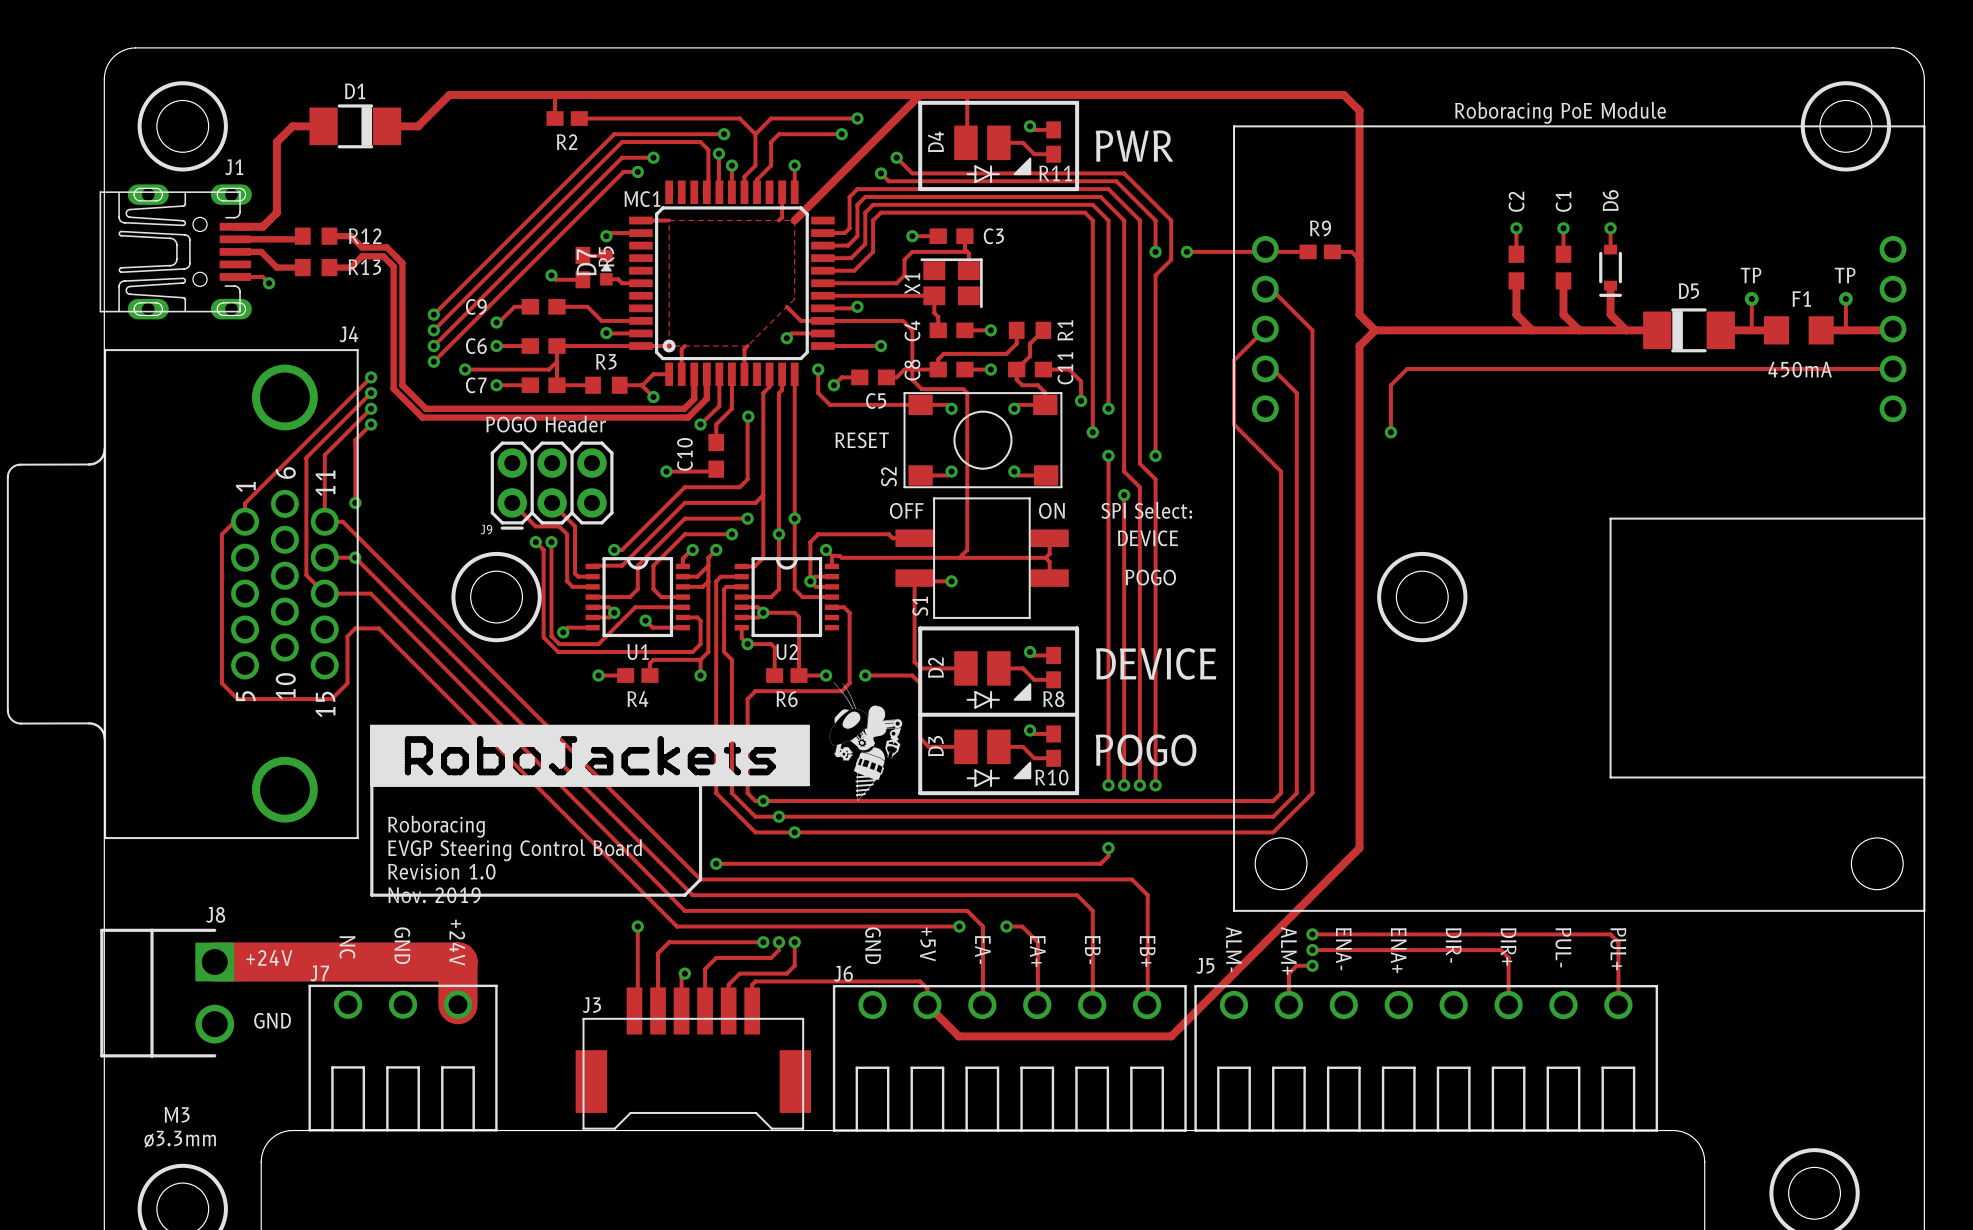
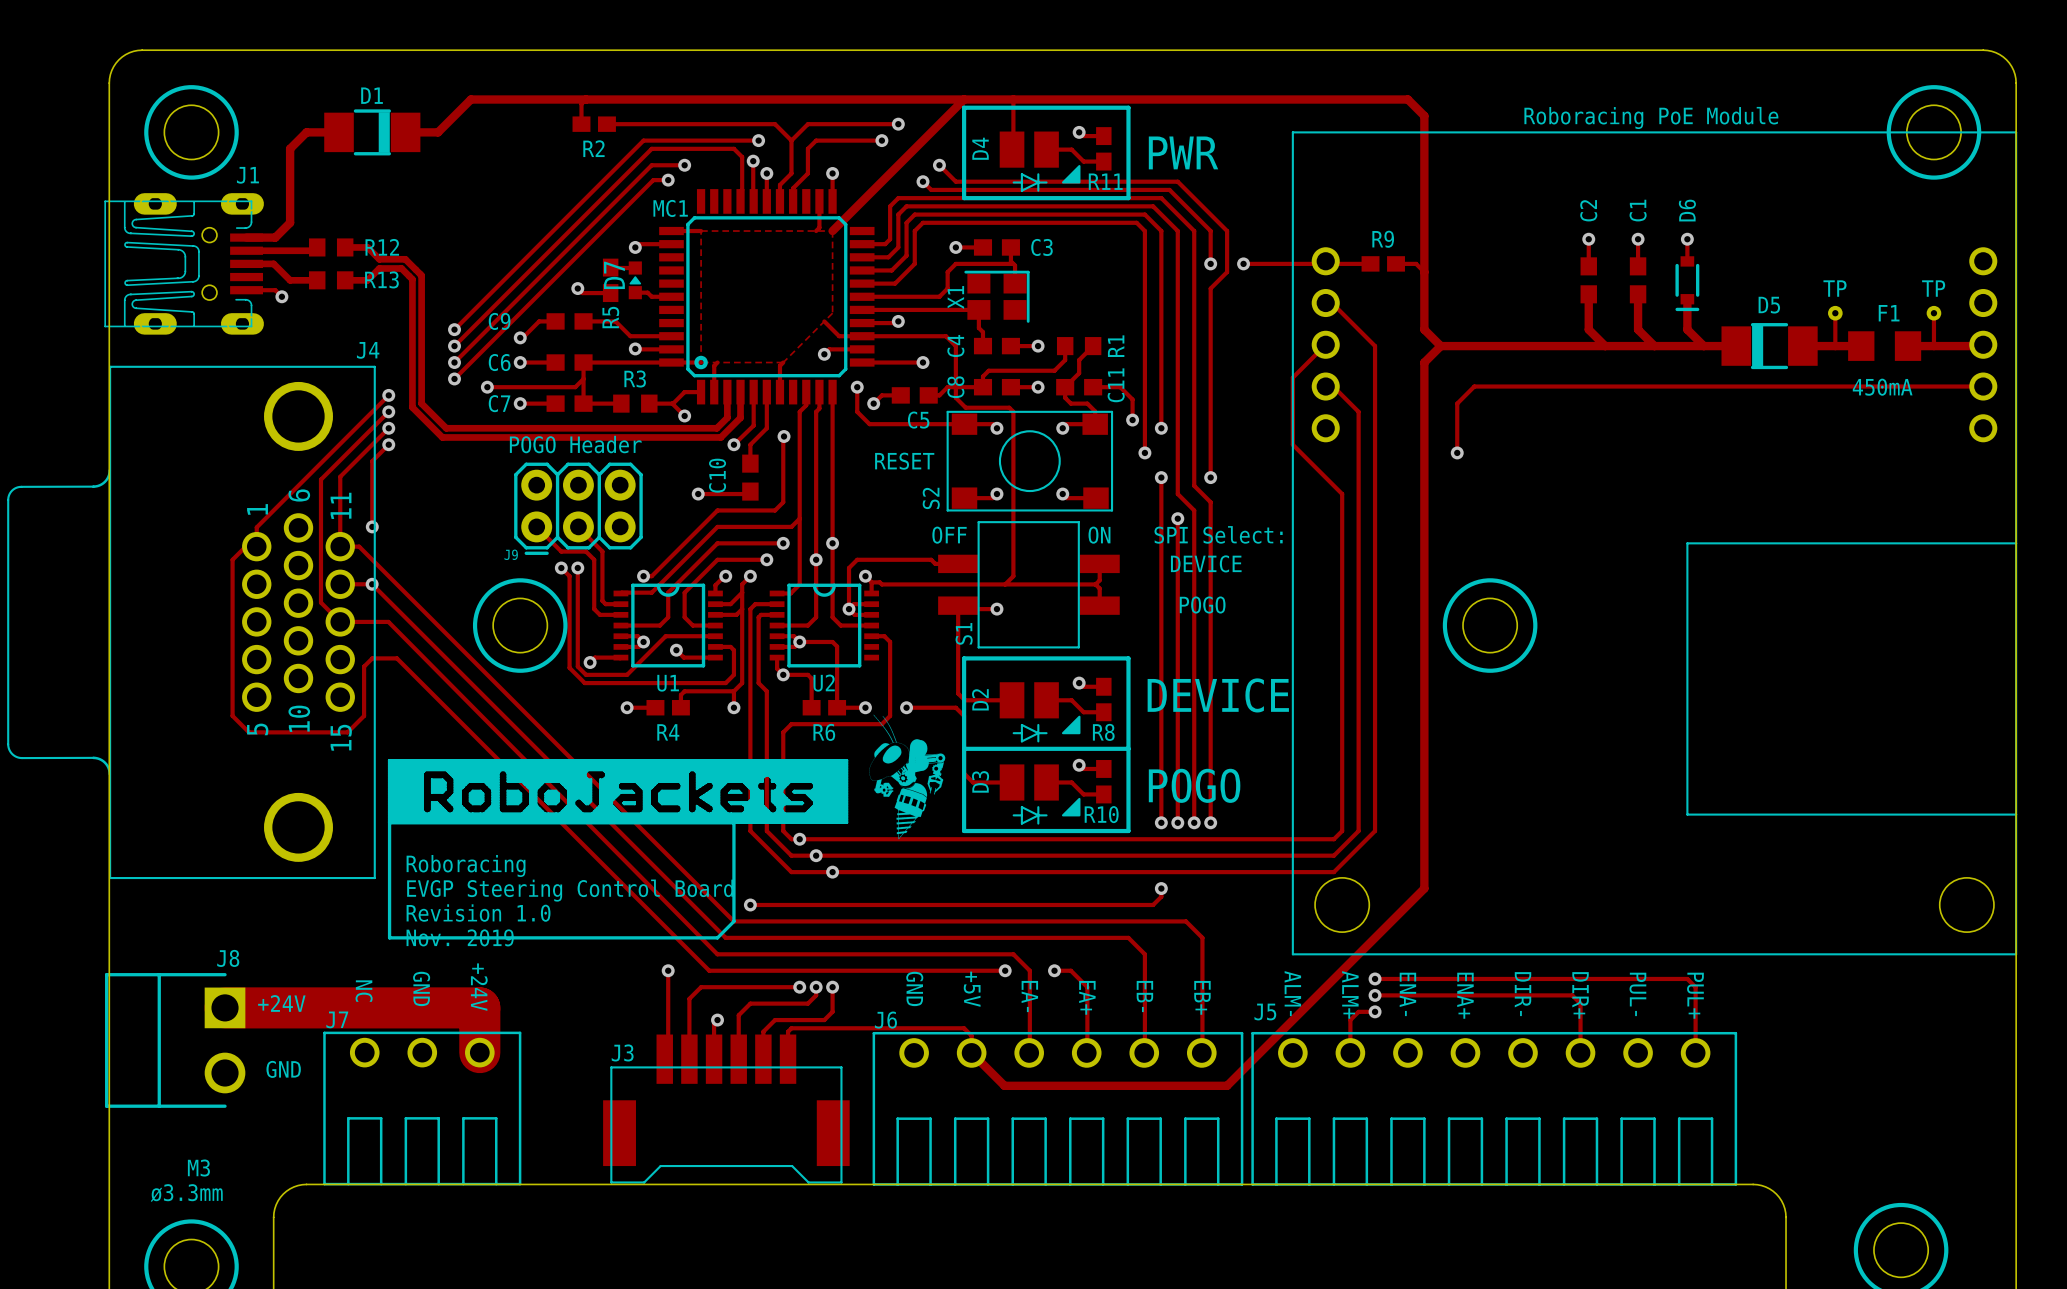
R5 name position: R5 (606, 256) -> R5 (610, 317)

